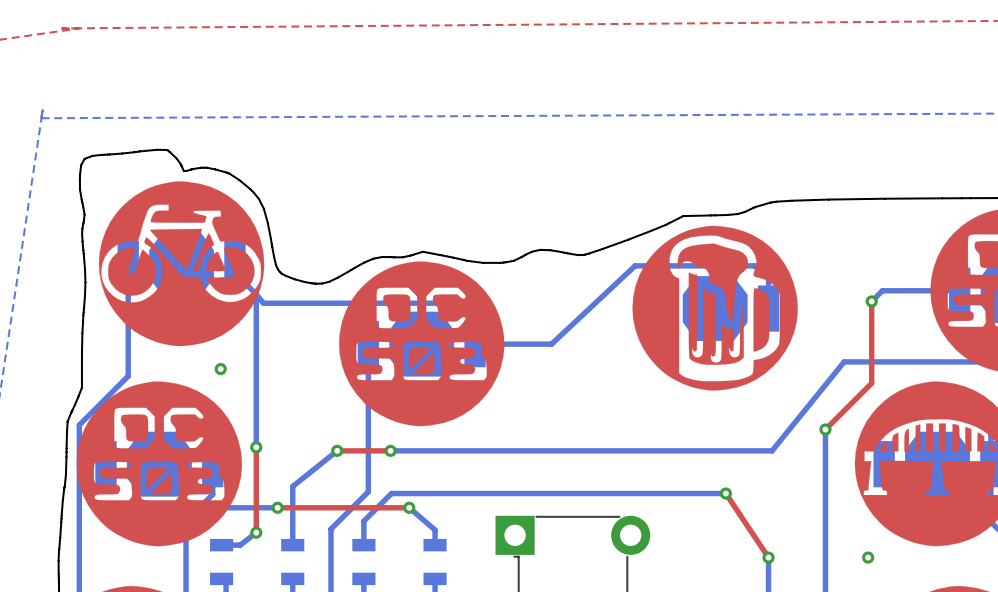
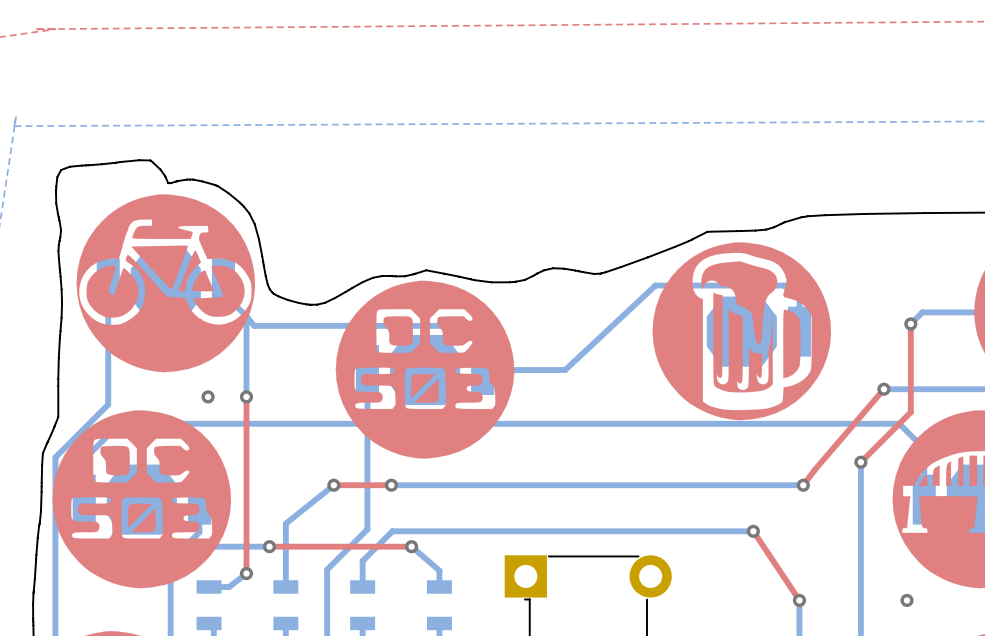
bottom track: (844, 361) (772, 450) -> none
top track: none -> (883, 389) (803, 485)
via: none -> (883, 389)
bottom track: (256, 369) (256, 447) -> none
top track: none -> (246, 396) (246, 481)
via position: (256, 447) -> (246, 396)
via: none -> (803, 485)
bottom track: none -> (84, 499) (84, 459) (119, 423) (899, 423) (924, 448) (924, 499)

